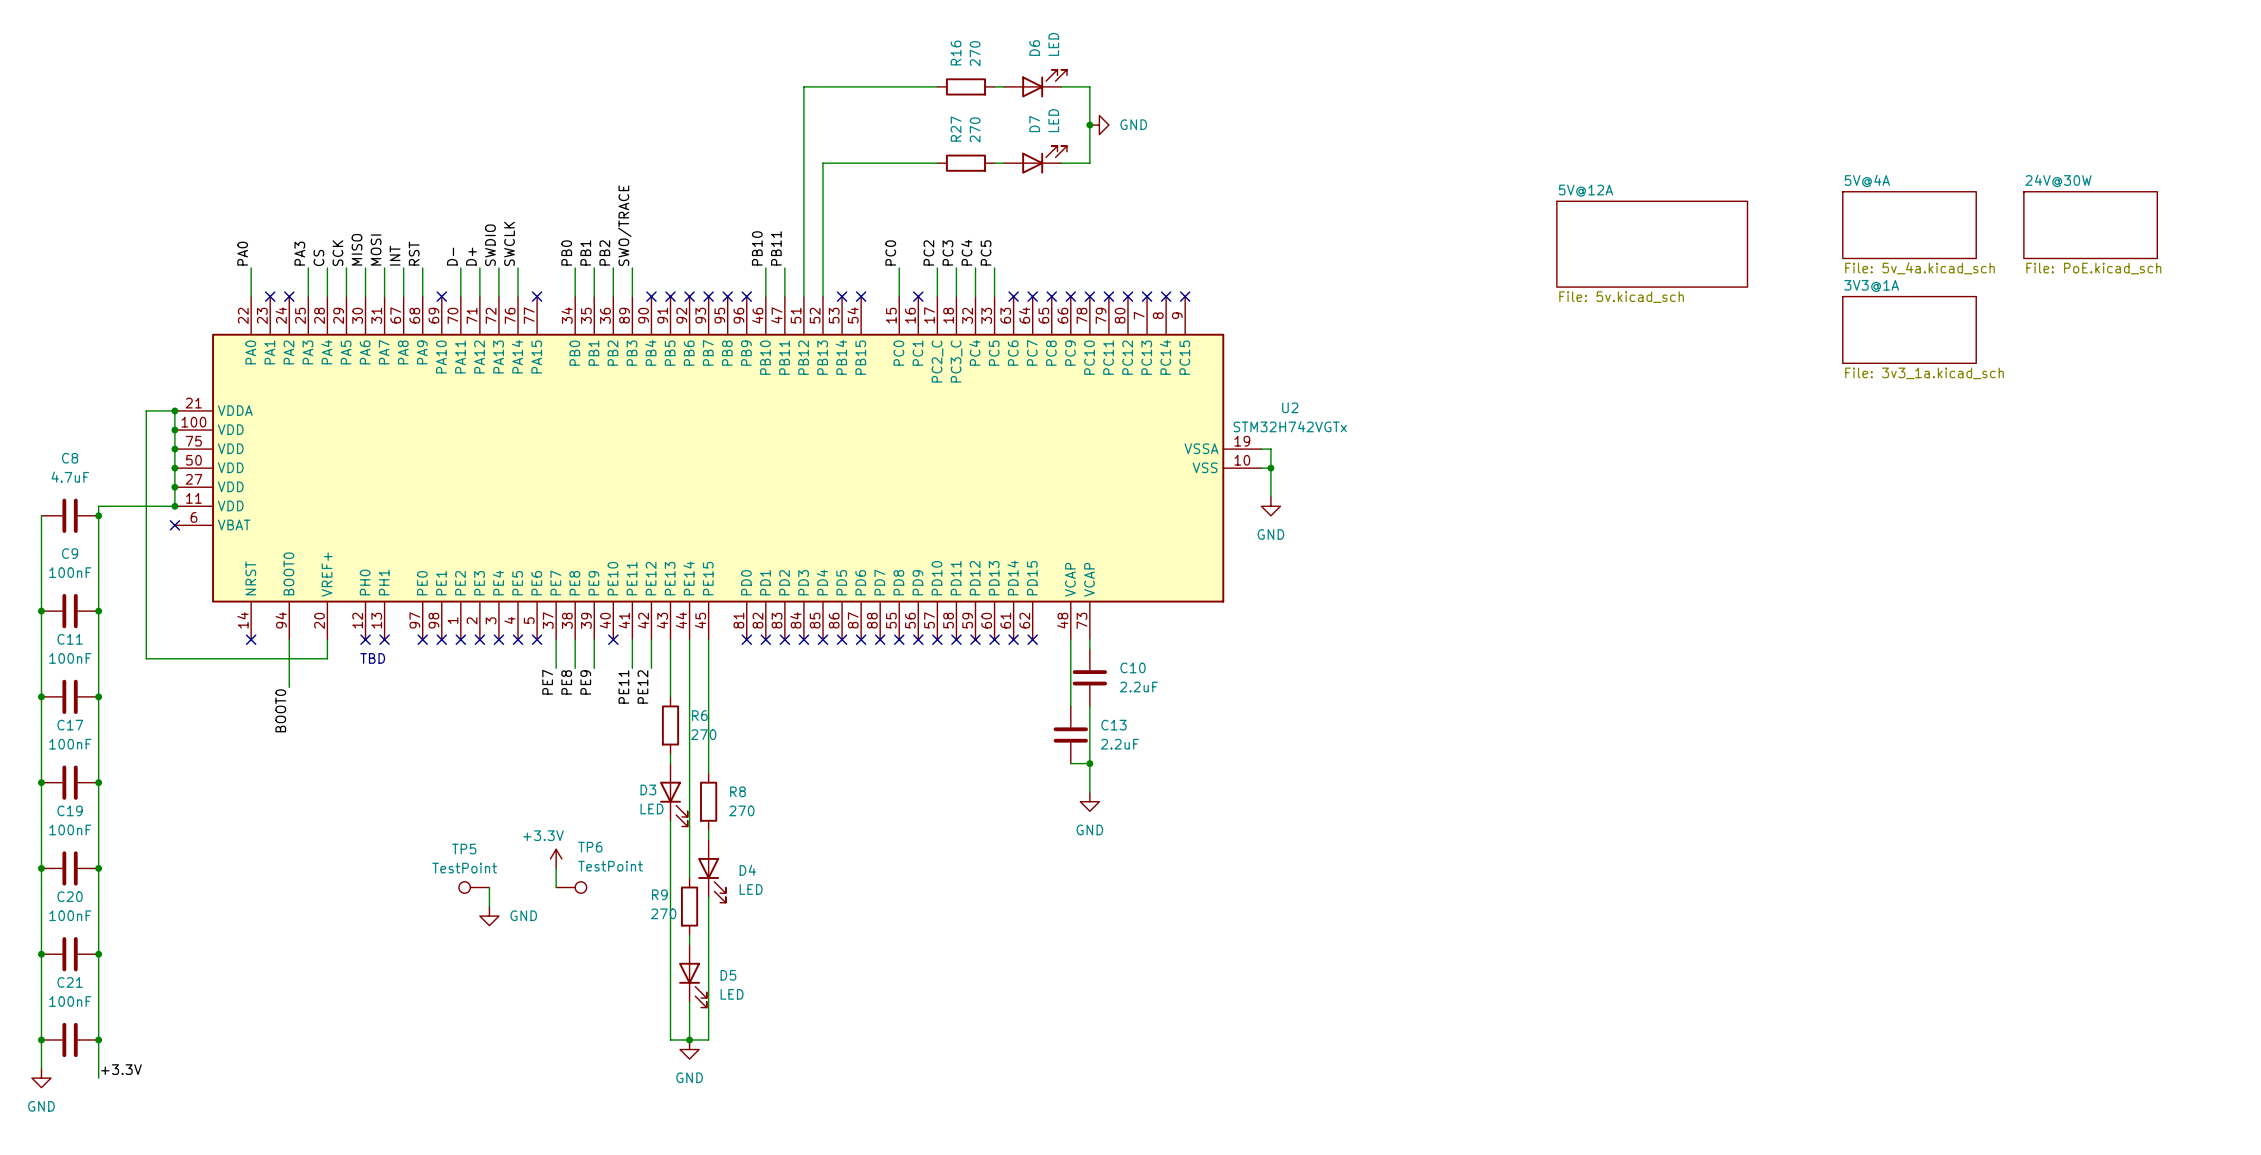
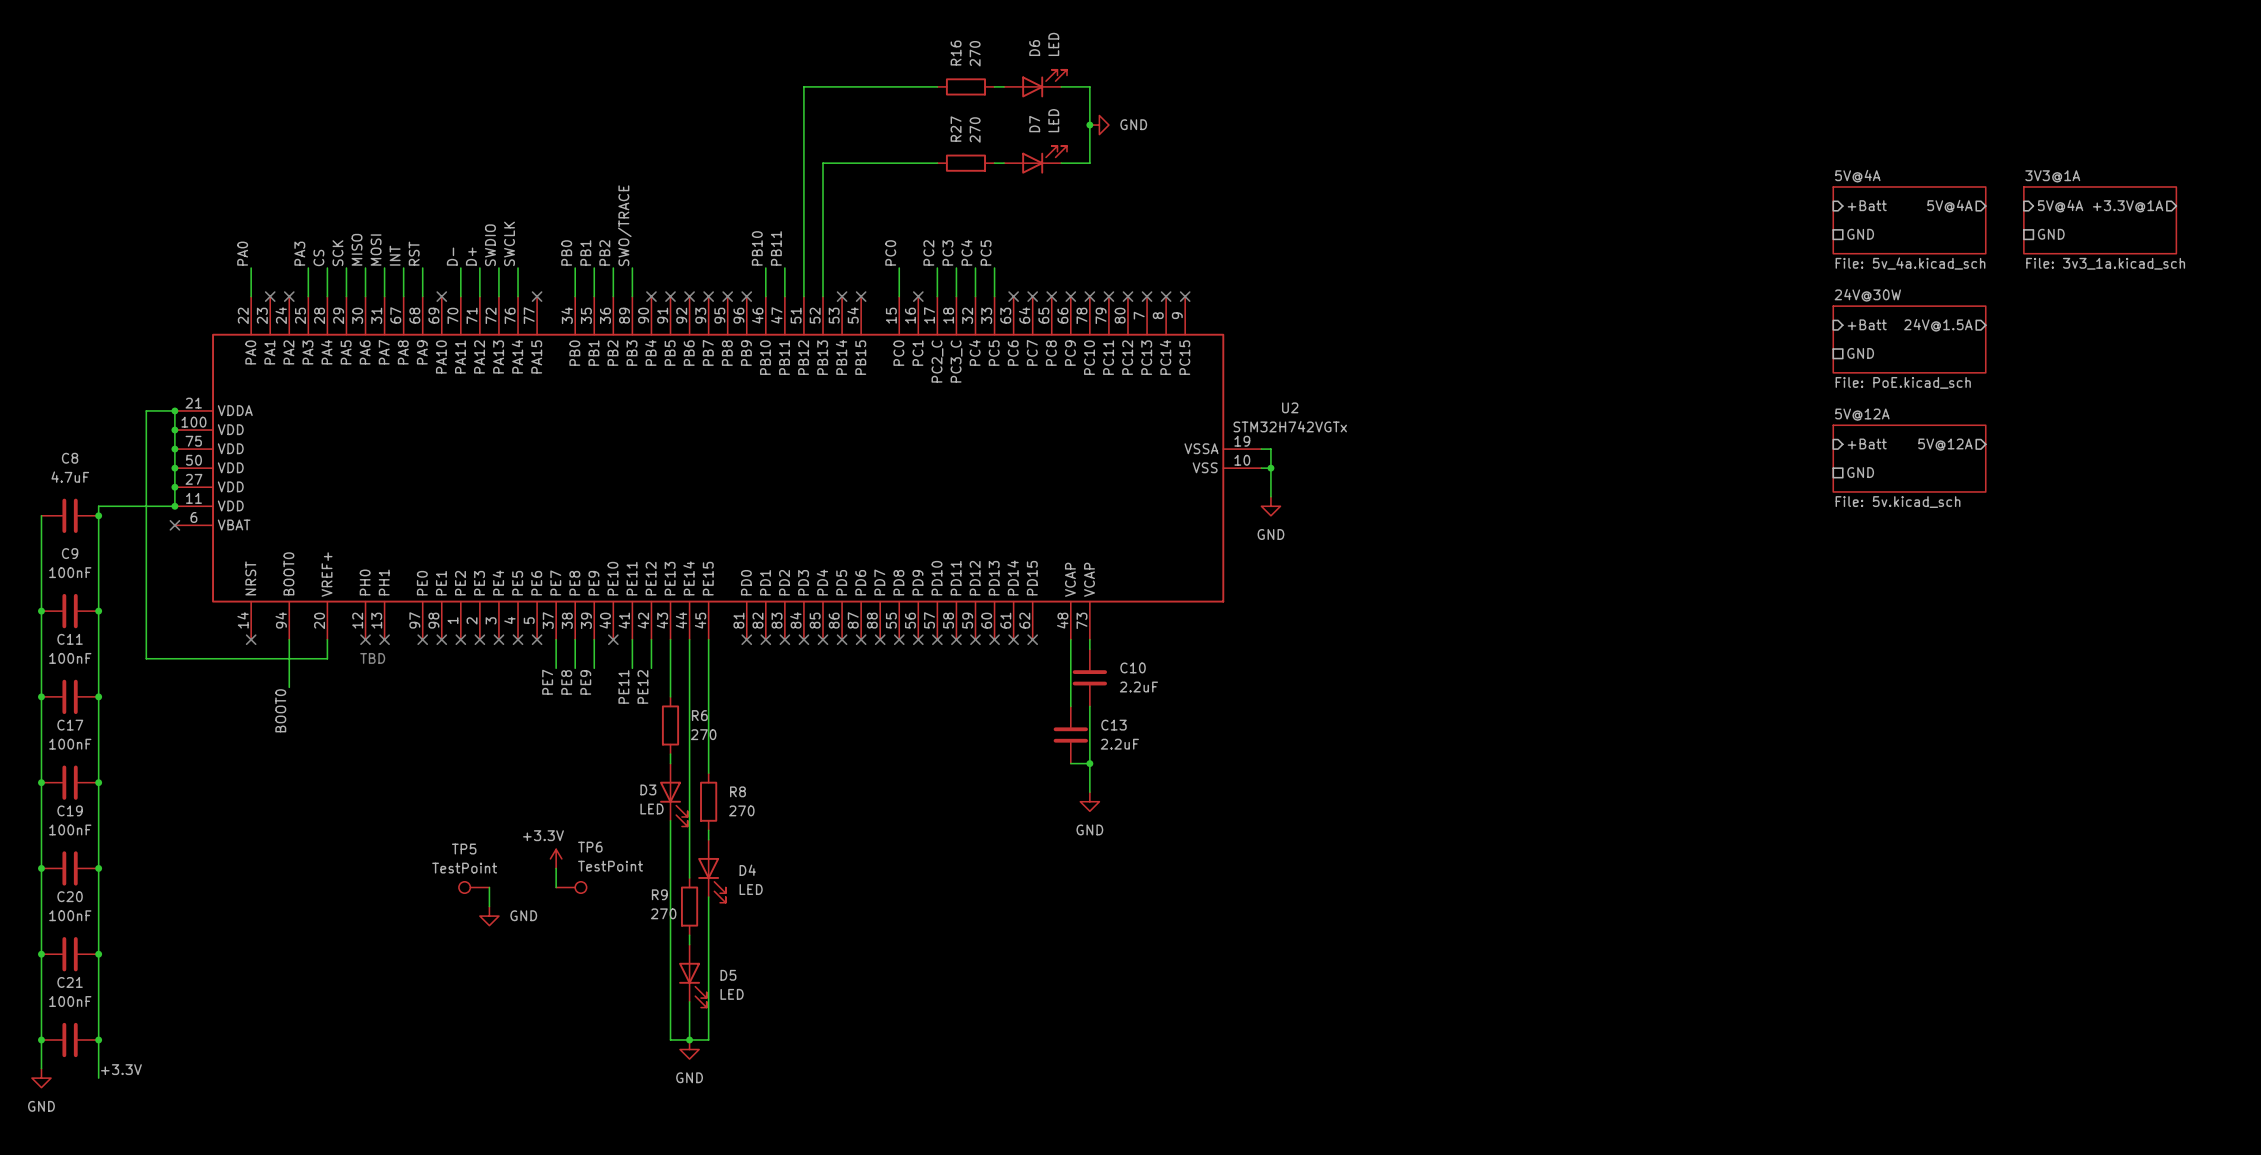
sheet 5V@12A name position: 5V@12A (1585, 190) -> 5V@12A (1862, 414)
sheet 5V@4A shape: [1842, 191, 1977, 260] -> [1832, 186, 1987, 255]
sheet 24V@30W shape: [2023, 191, 2158, 260] -> [1832, 305, 1987, 374]
sheet 5V@12A shape: [1556, 200, 1749, 288] -> [1832, 424, 1987, 493]
sheet pin: none -> +Batt (1867, 205)
sheet pin: none -> 5V@4A (1949, 206)
sheet pin: none -> 5V@4A (2060, 206)
sheet pin: none -> +3.3V@1A (2128, 206)
sheet pin: none -> GND (1860, 234)
sheet pin: none -> GND (2051, 234)
sheet 3V3@1A shape: [1842, 296, 1977, 364] -> [2023, 186, 2177, 255]
sheet 5V@12A value position: File: 5v.kicad_sch (1621, 297) -> File: 5v.kicad_sch (1898, 502)
sheet pin: none -> +Batt (1867, 324)
sheet pin: none -> 24V@1.5A (1938, 325)
sheet pin: none -> GND (1860, 353)
sheet pin: none -> +Batt (1867, 443)
sheet pin: none -> 5V@12A (1945, 444)
sheet pin: none -> GND (1860, 472)

